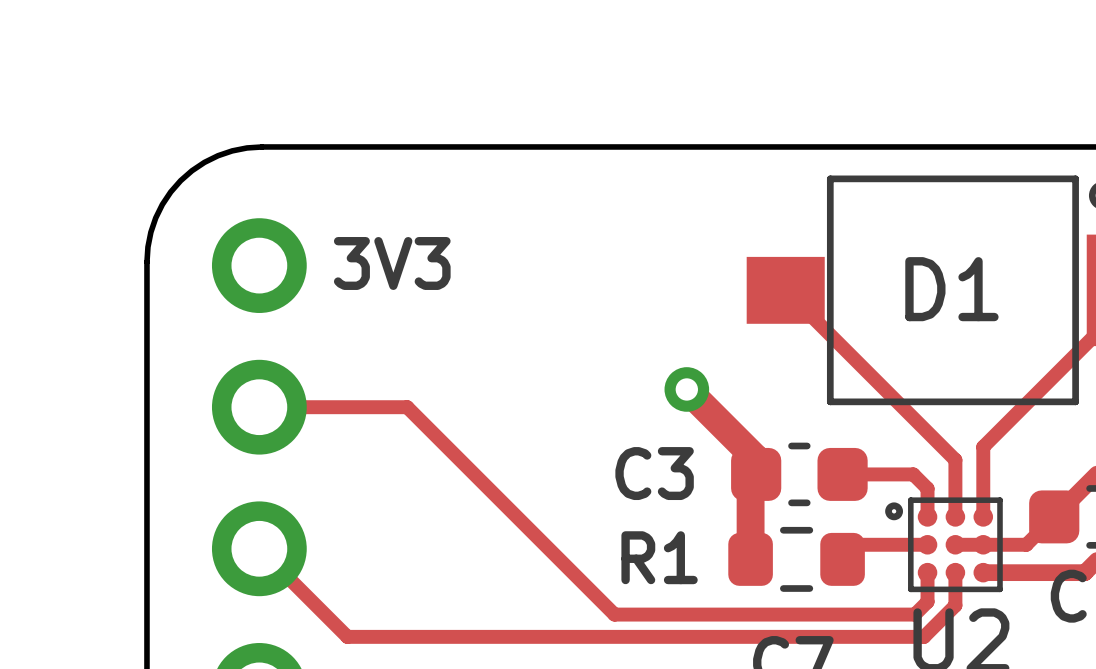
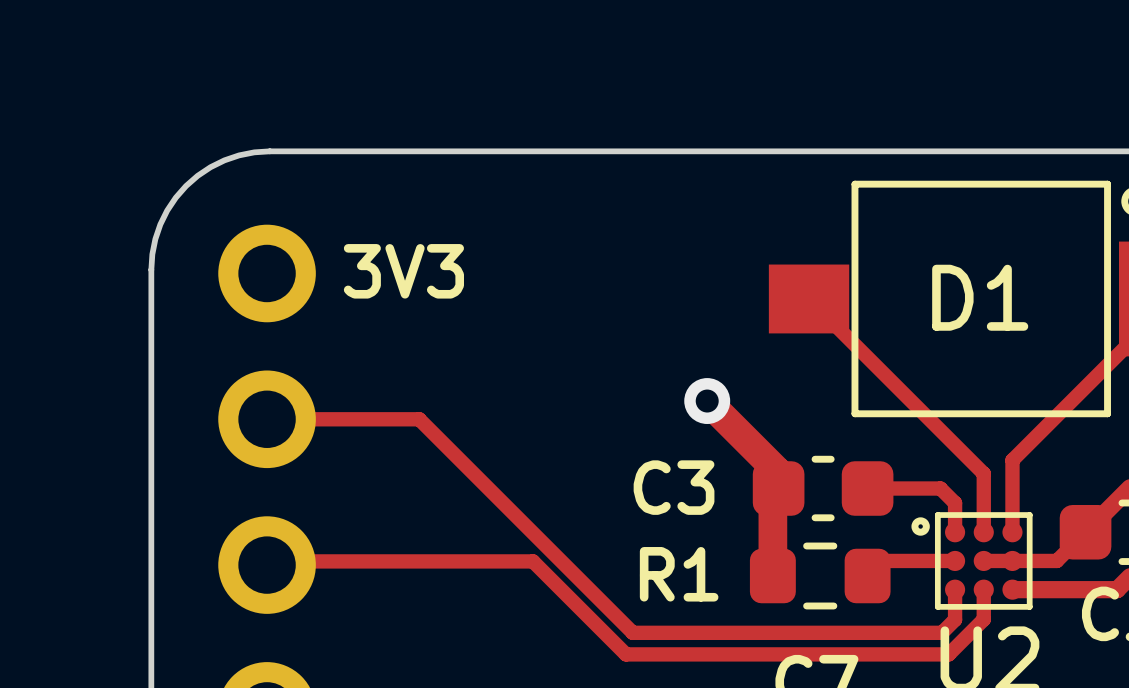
top track: (259, 548) (347, 636) (924, 636) (955, 605) (955, 601) -> (267, 565) (270, 561) (533, 561) (625, 654) (948, 654) (983, 619)

